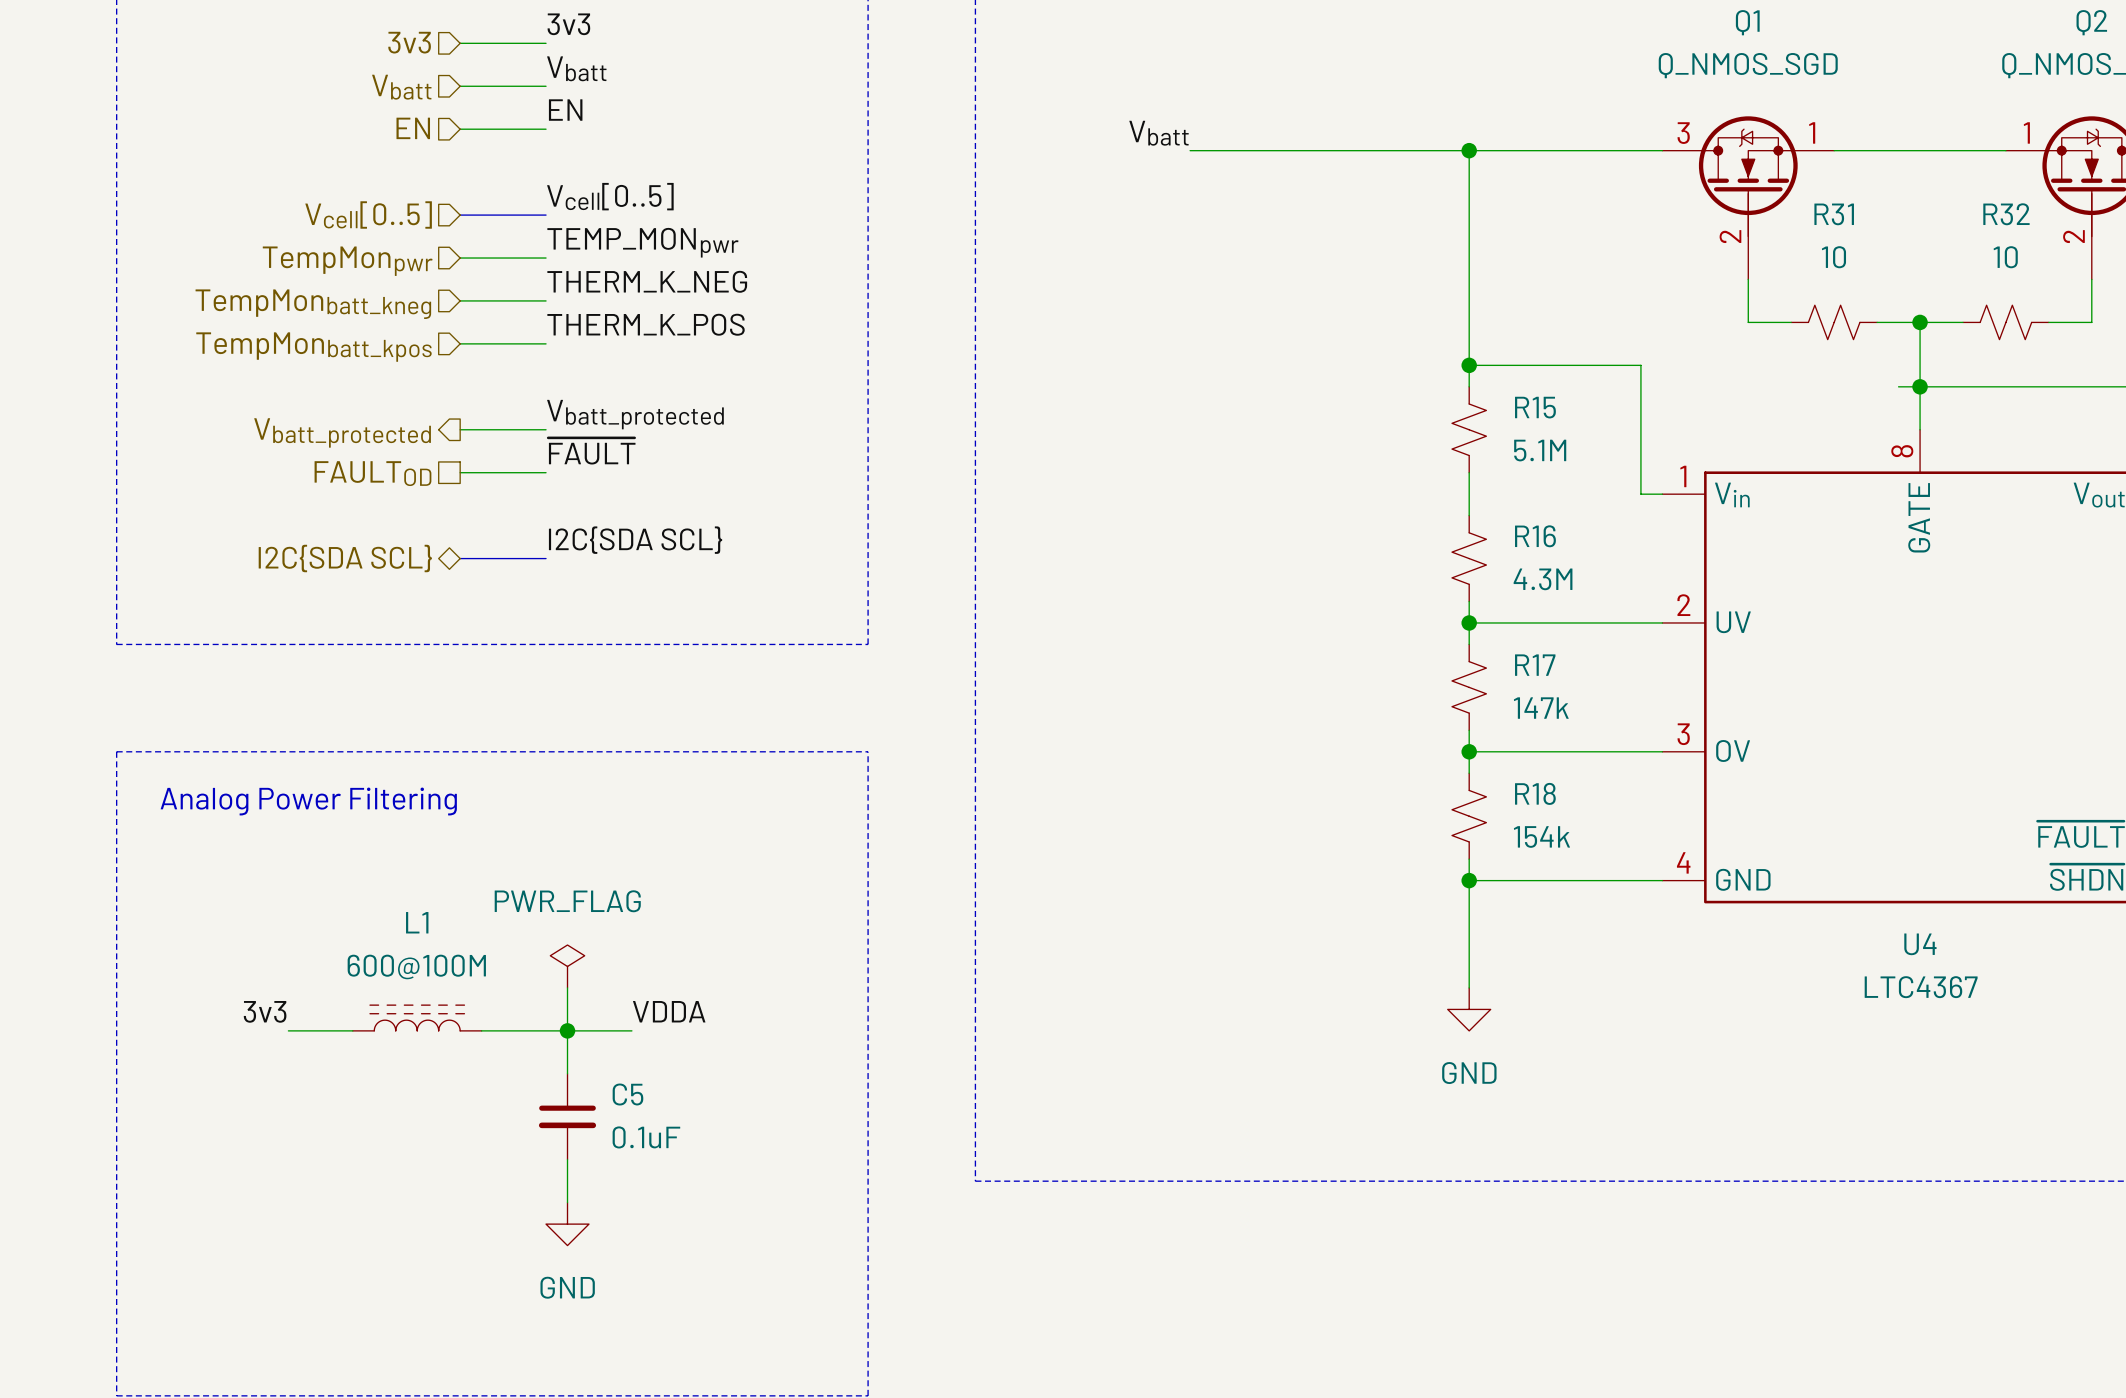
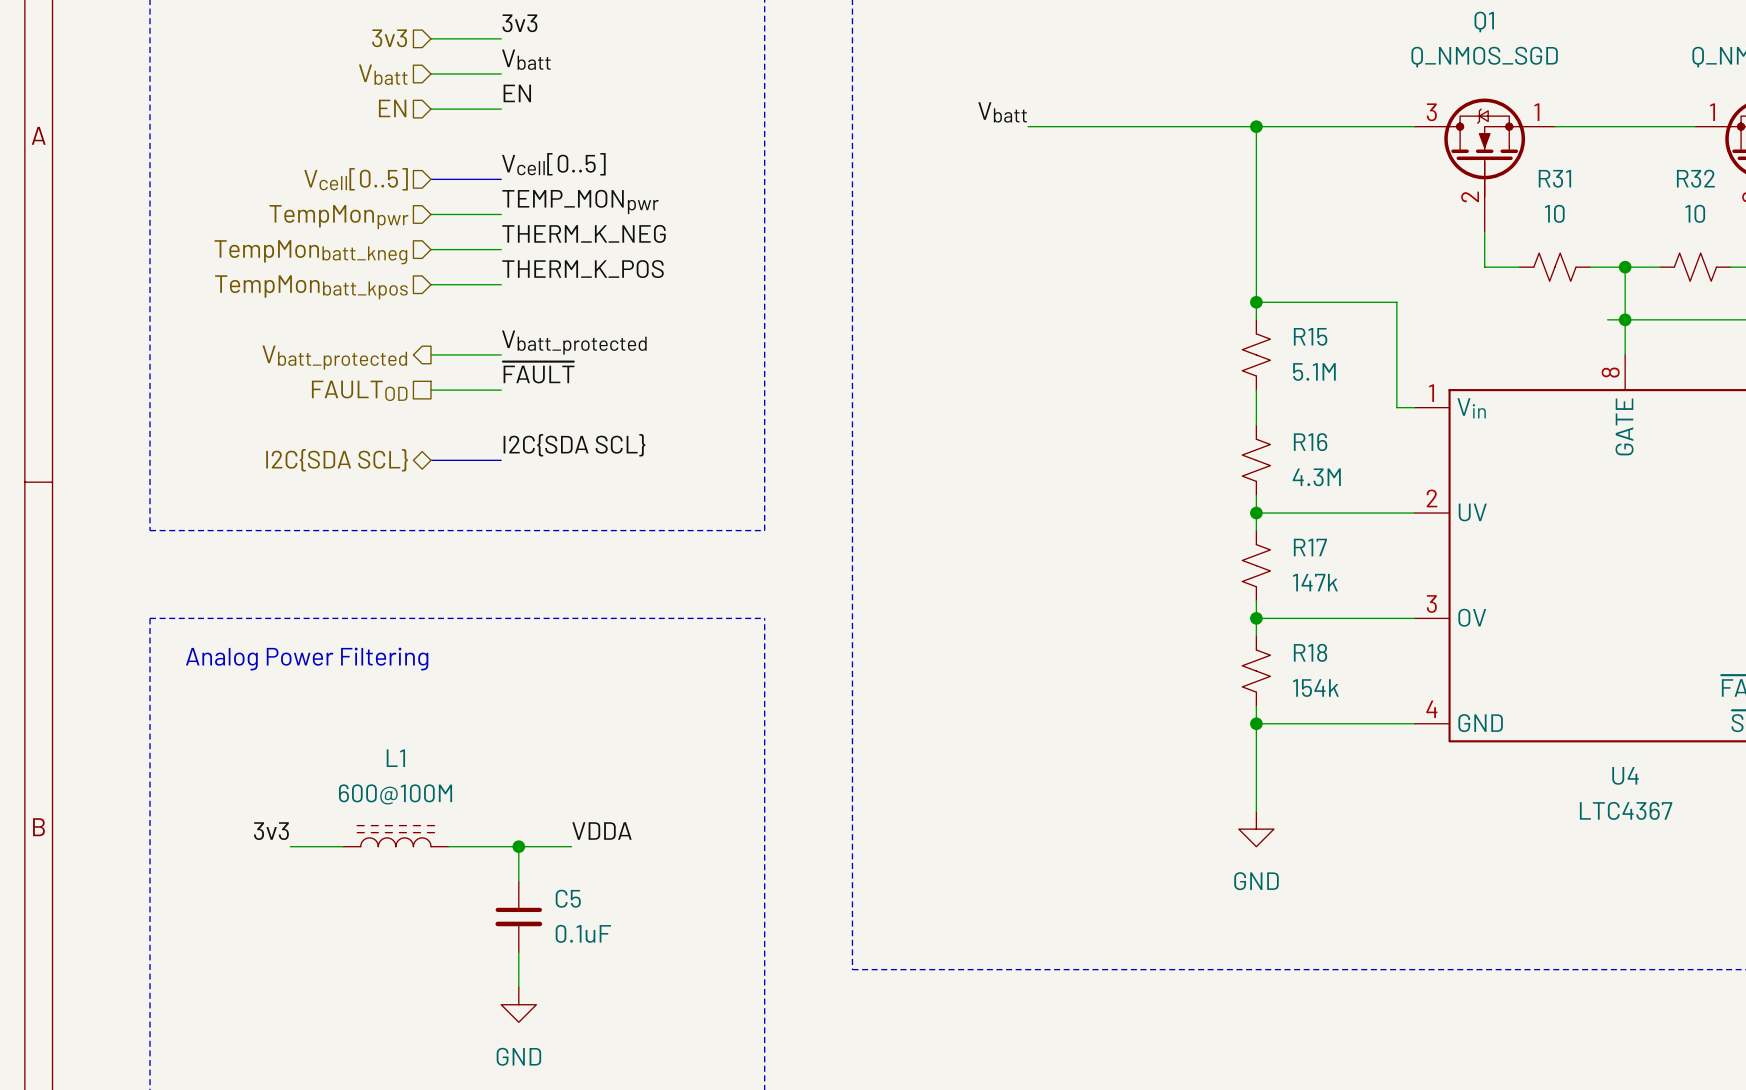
power symbol: PWR_FLAG (567, 966) -> none
wire: (567, 987) (567, 1030) -> none

